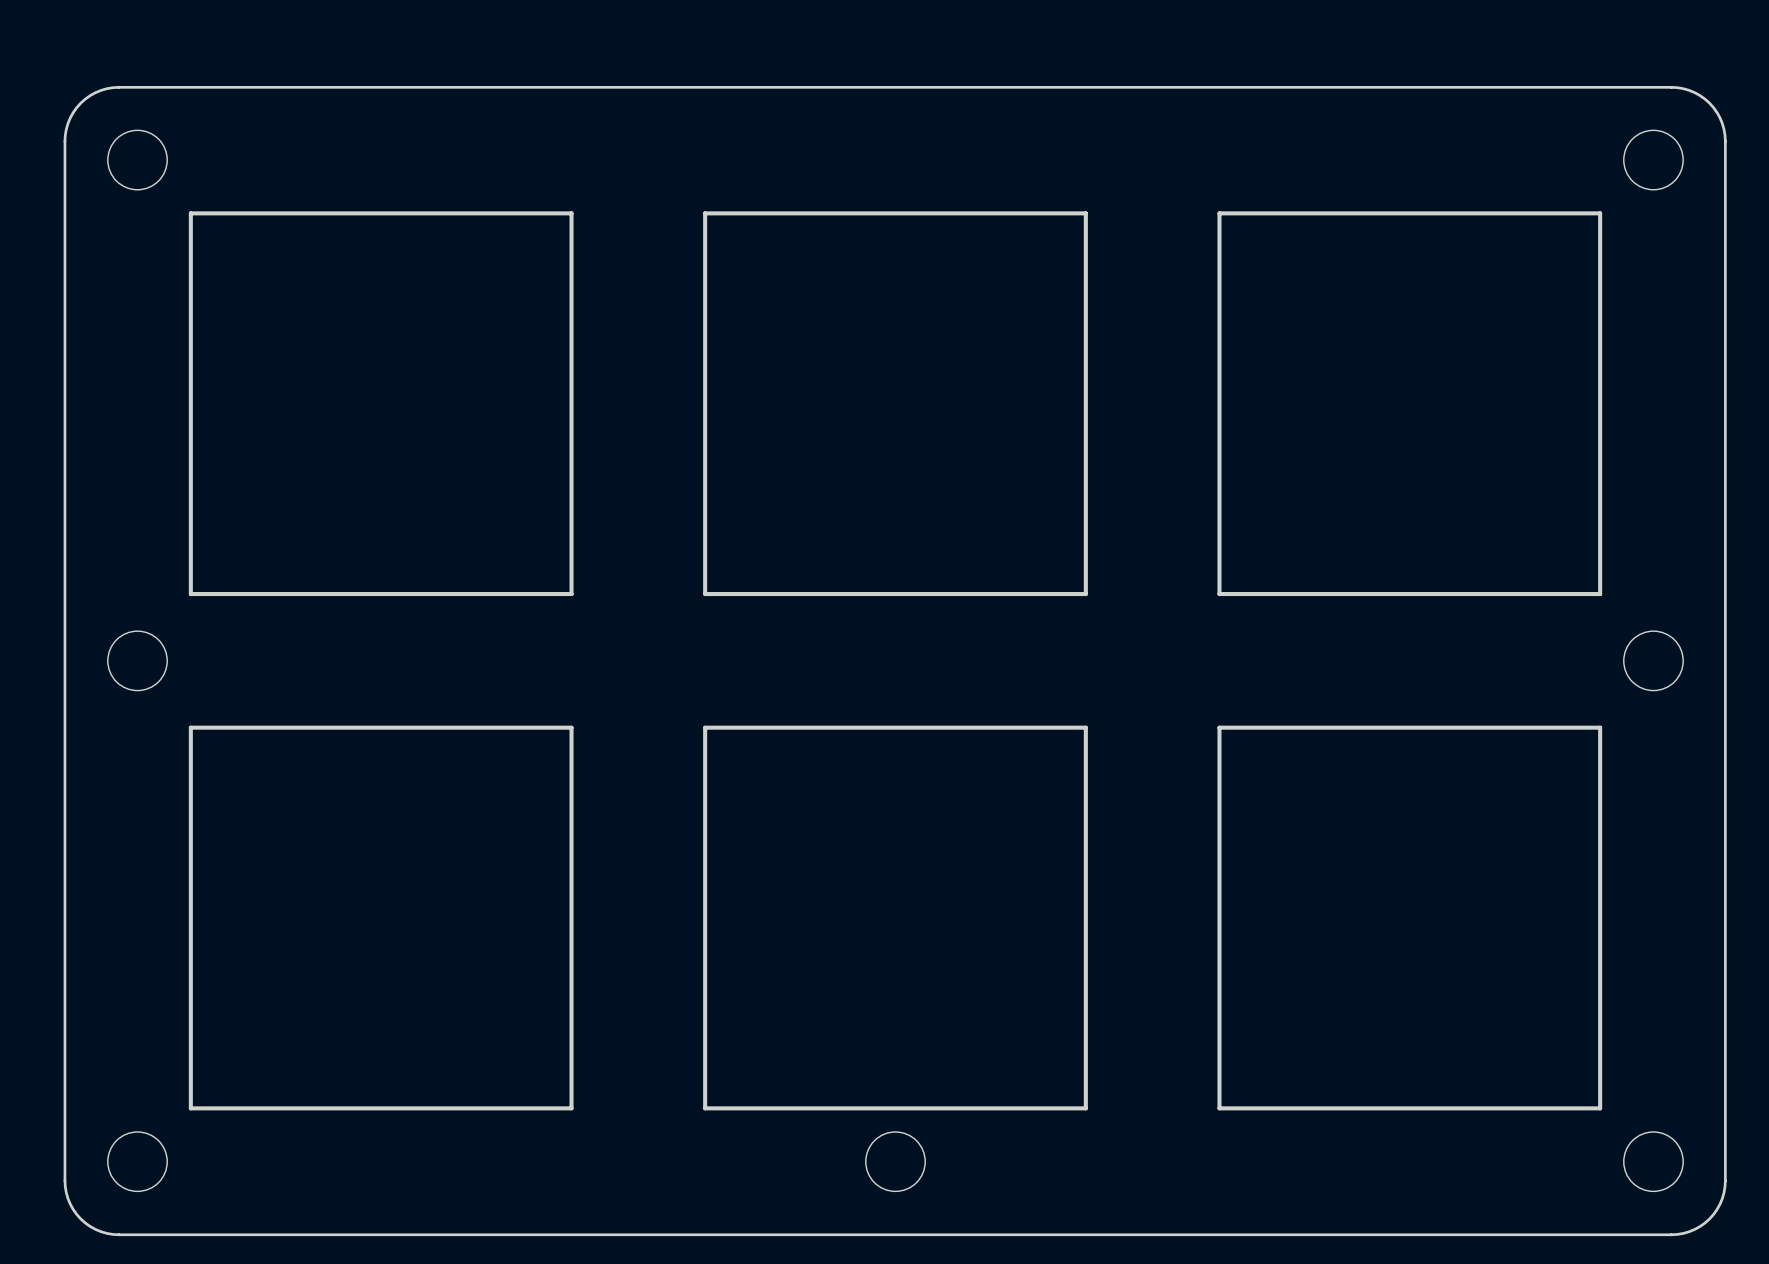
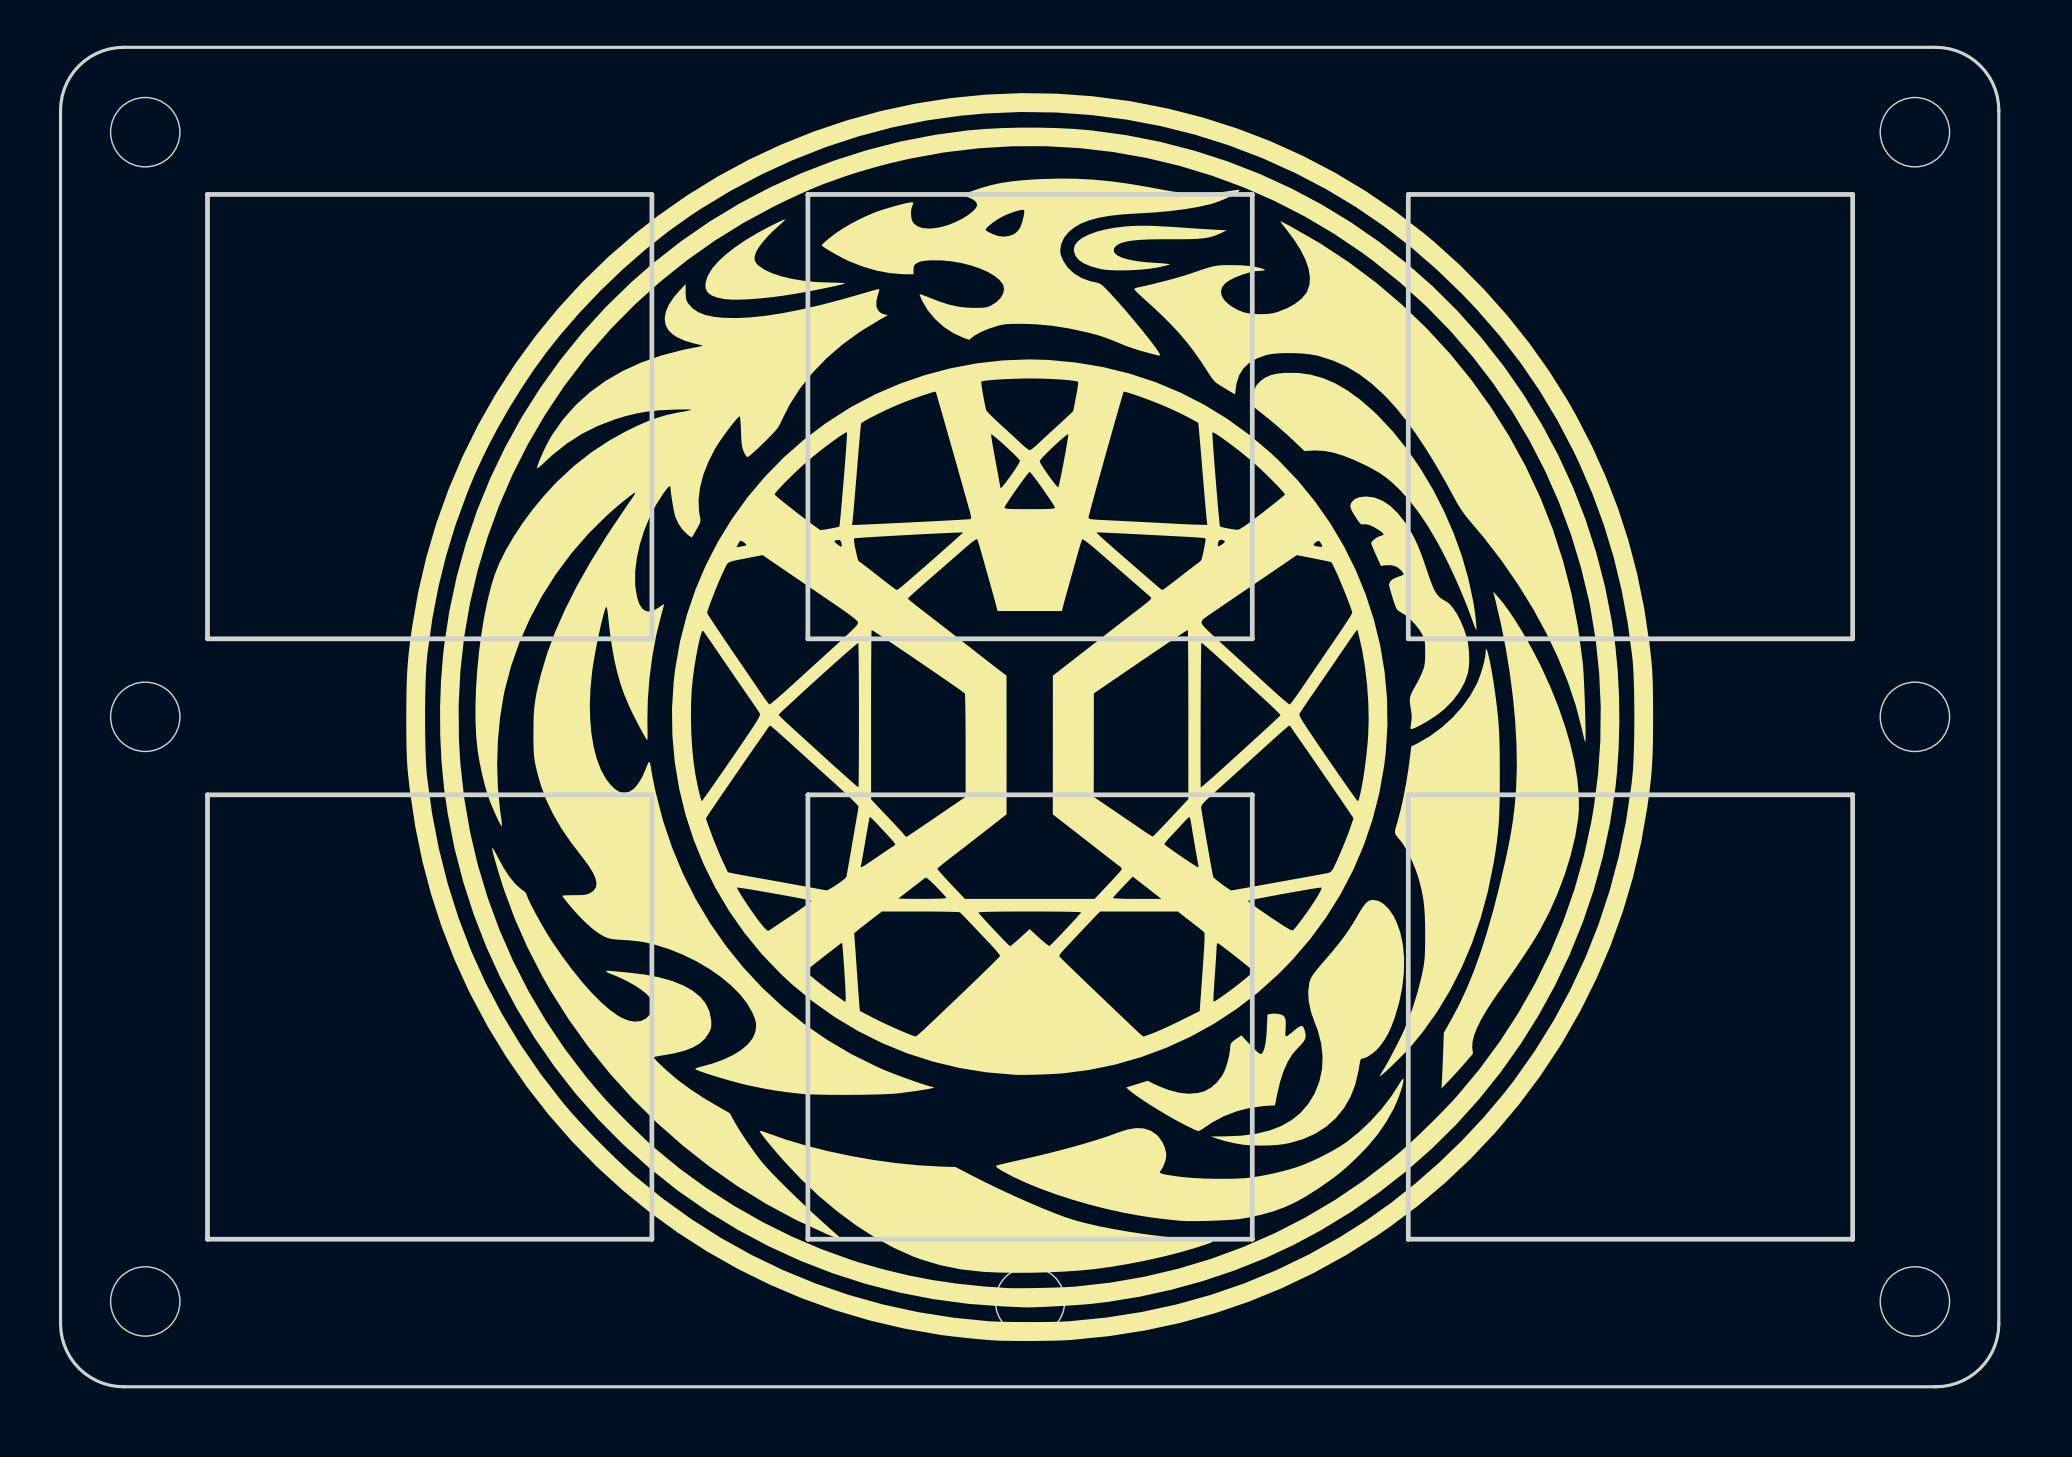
drawing: none -> [406, 93, 1654, 1341]

